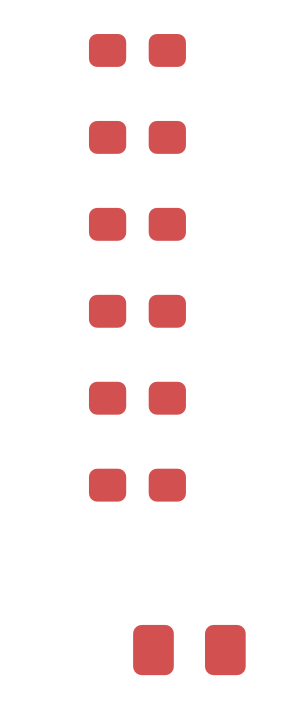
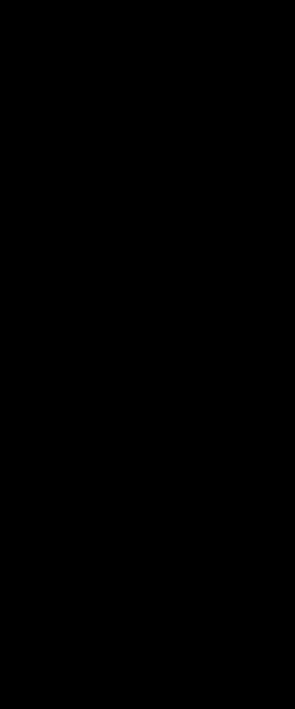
part: (137, 50) -> none
part: (137, 137) -> none
part: (137, 224) -> none
part: (137, 311) -> none
part: (137, 398) -> none
part: (137, 485) -> none
part: (189, 650) -> none

